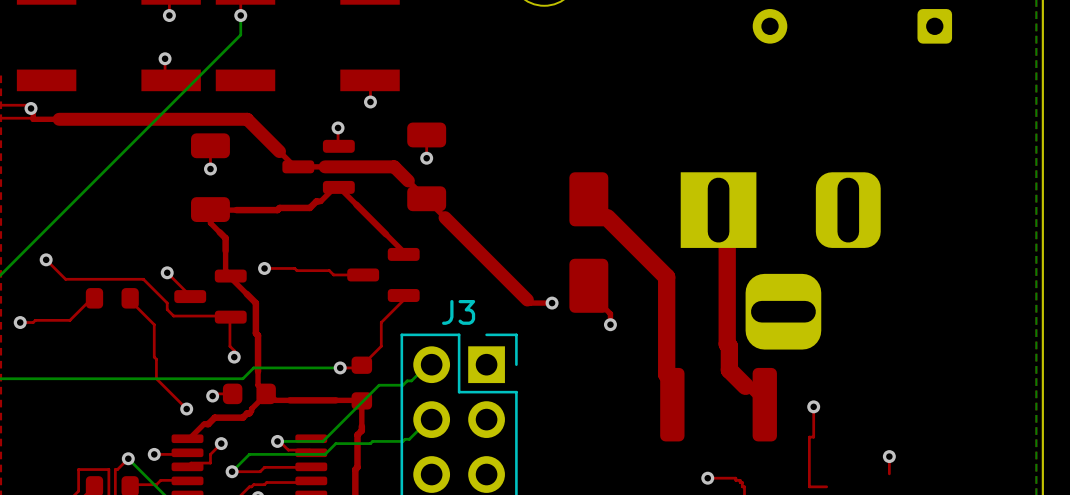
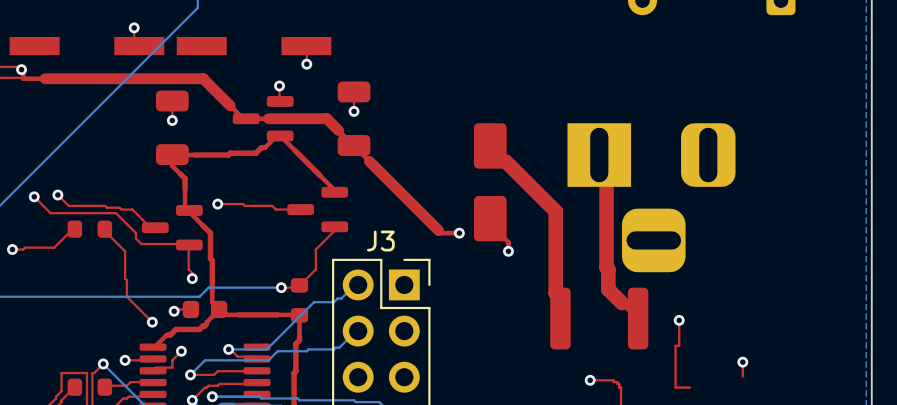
top track: (167, 272) (191, 296) -> (57, 195) (68, 205) (105, 205) (106, 207) (132, 209) (150, 227) (155, 227)
via position: (167, 272) -> (57, 195)

